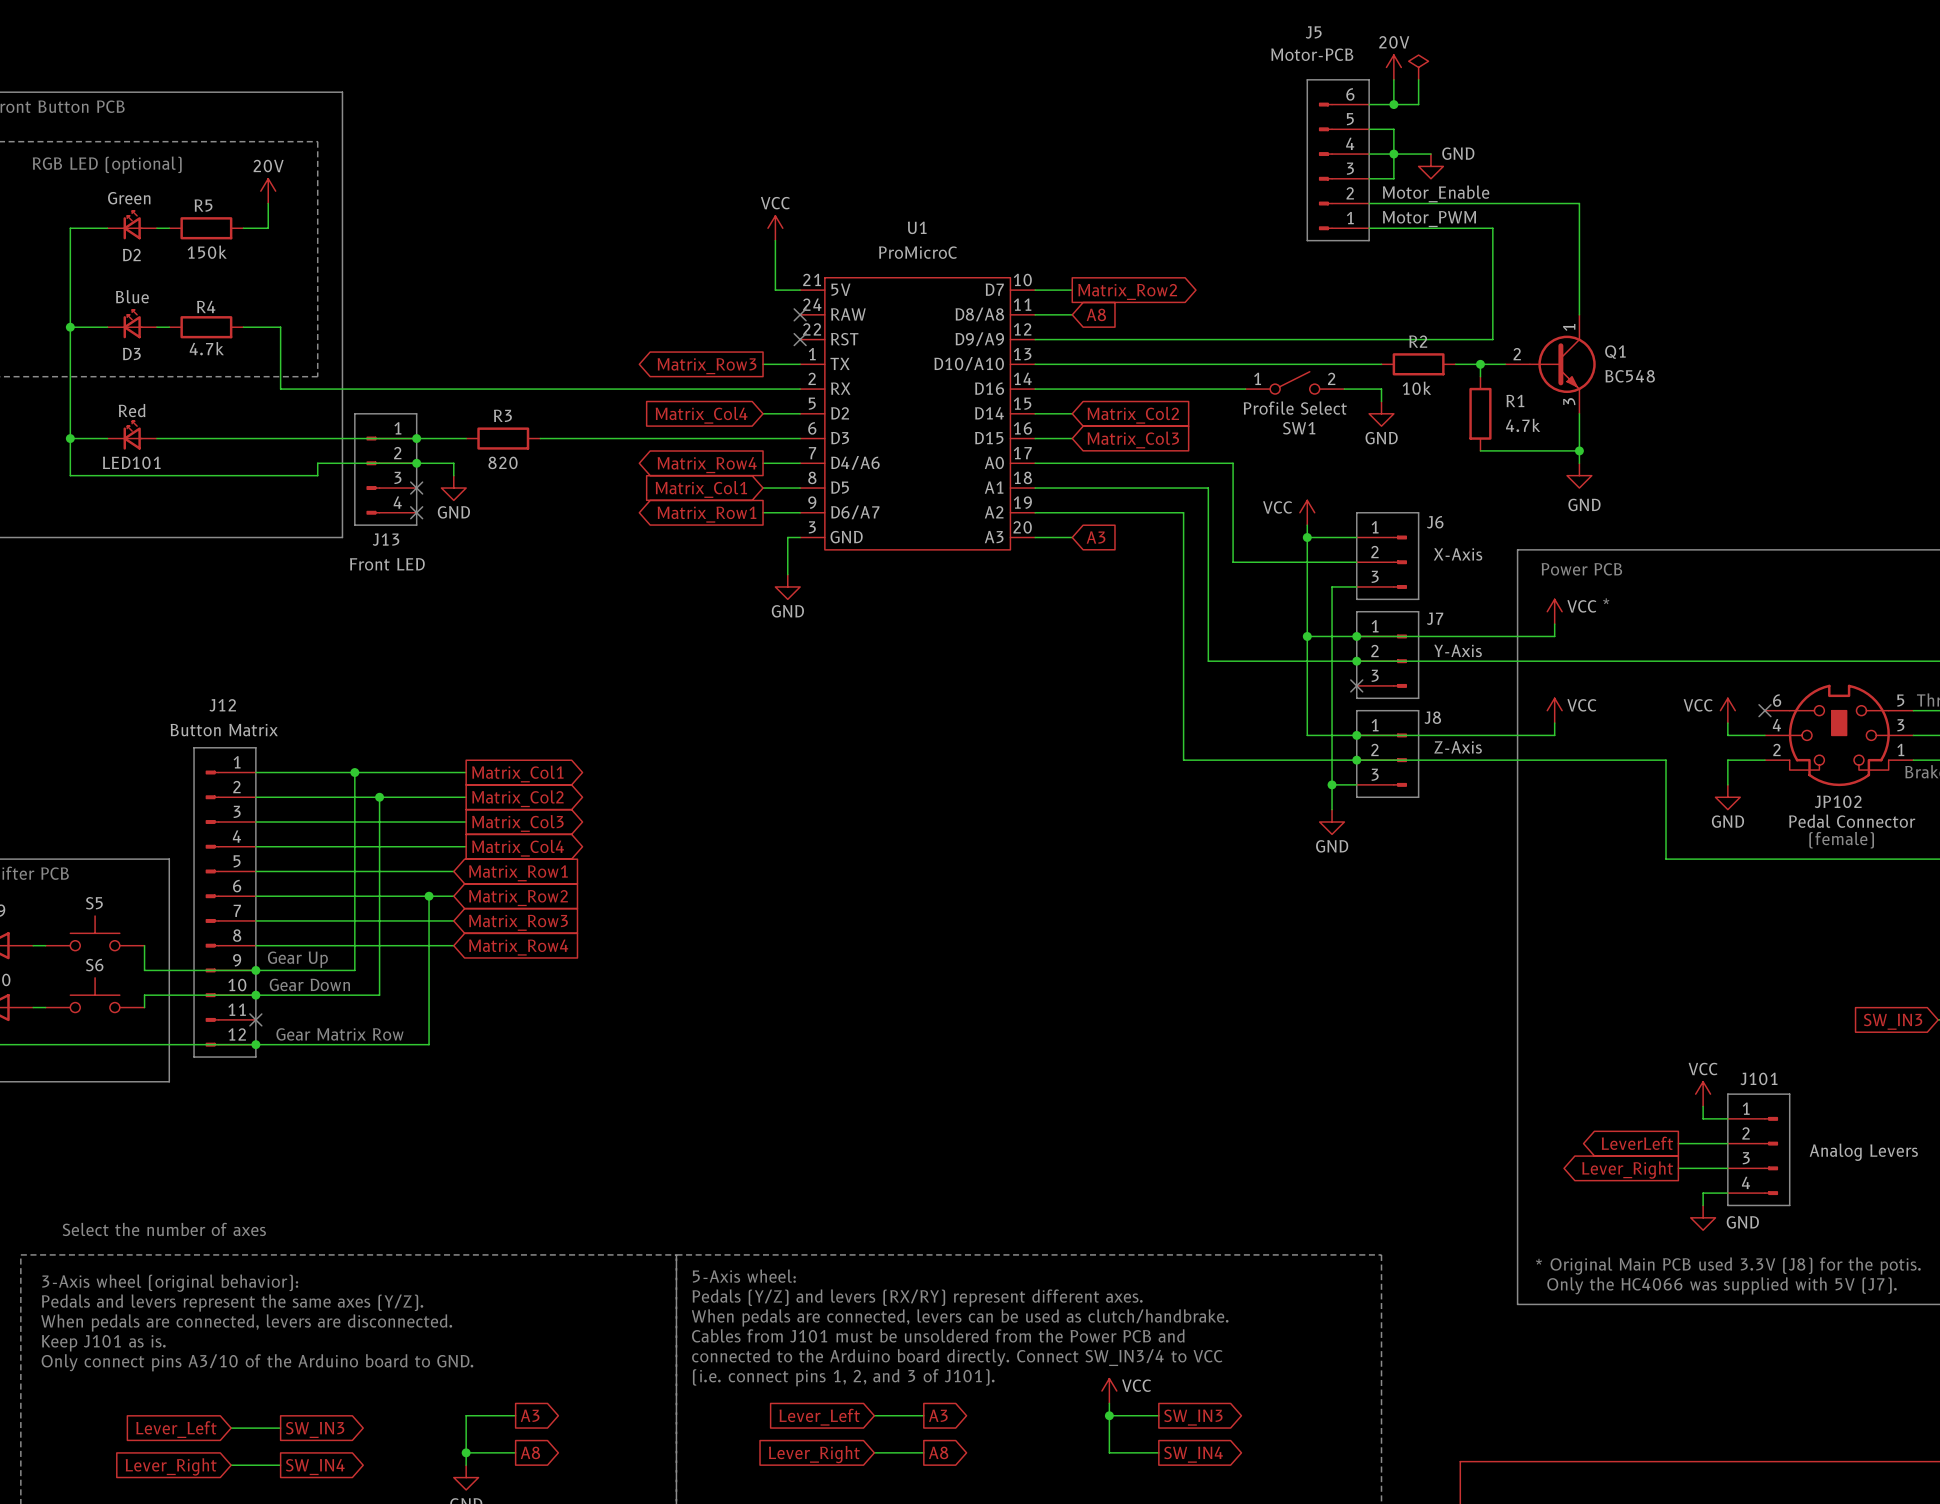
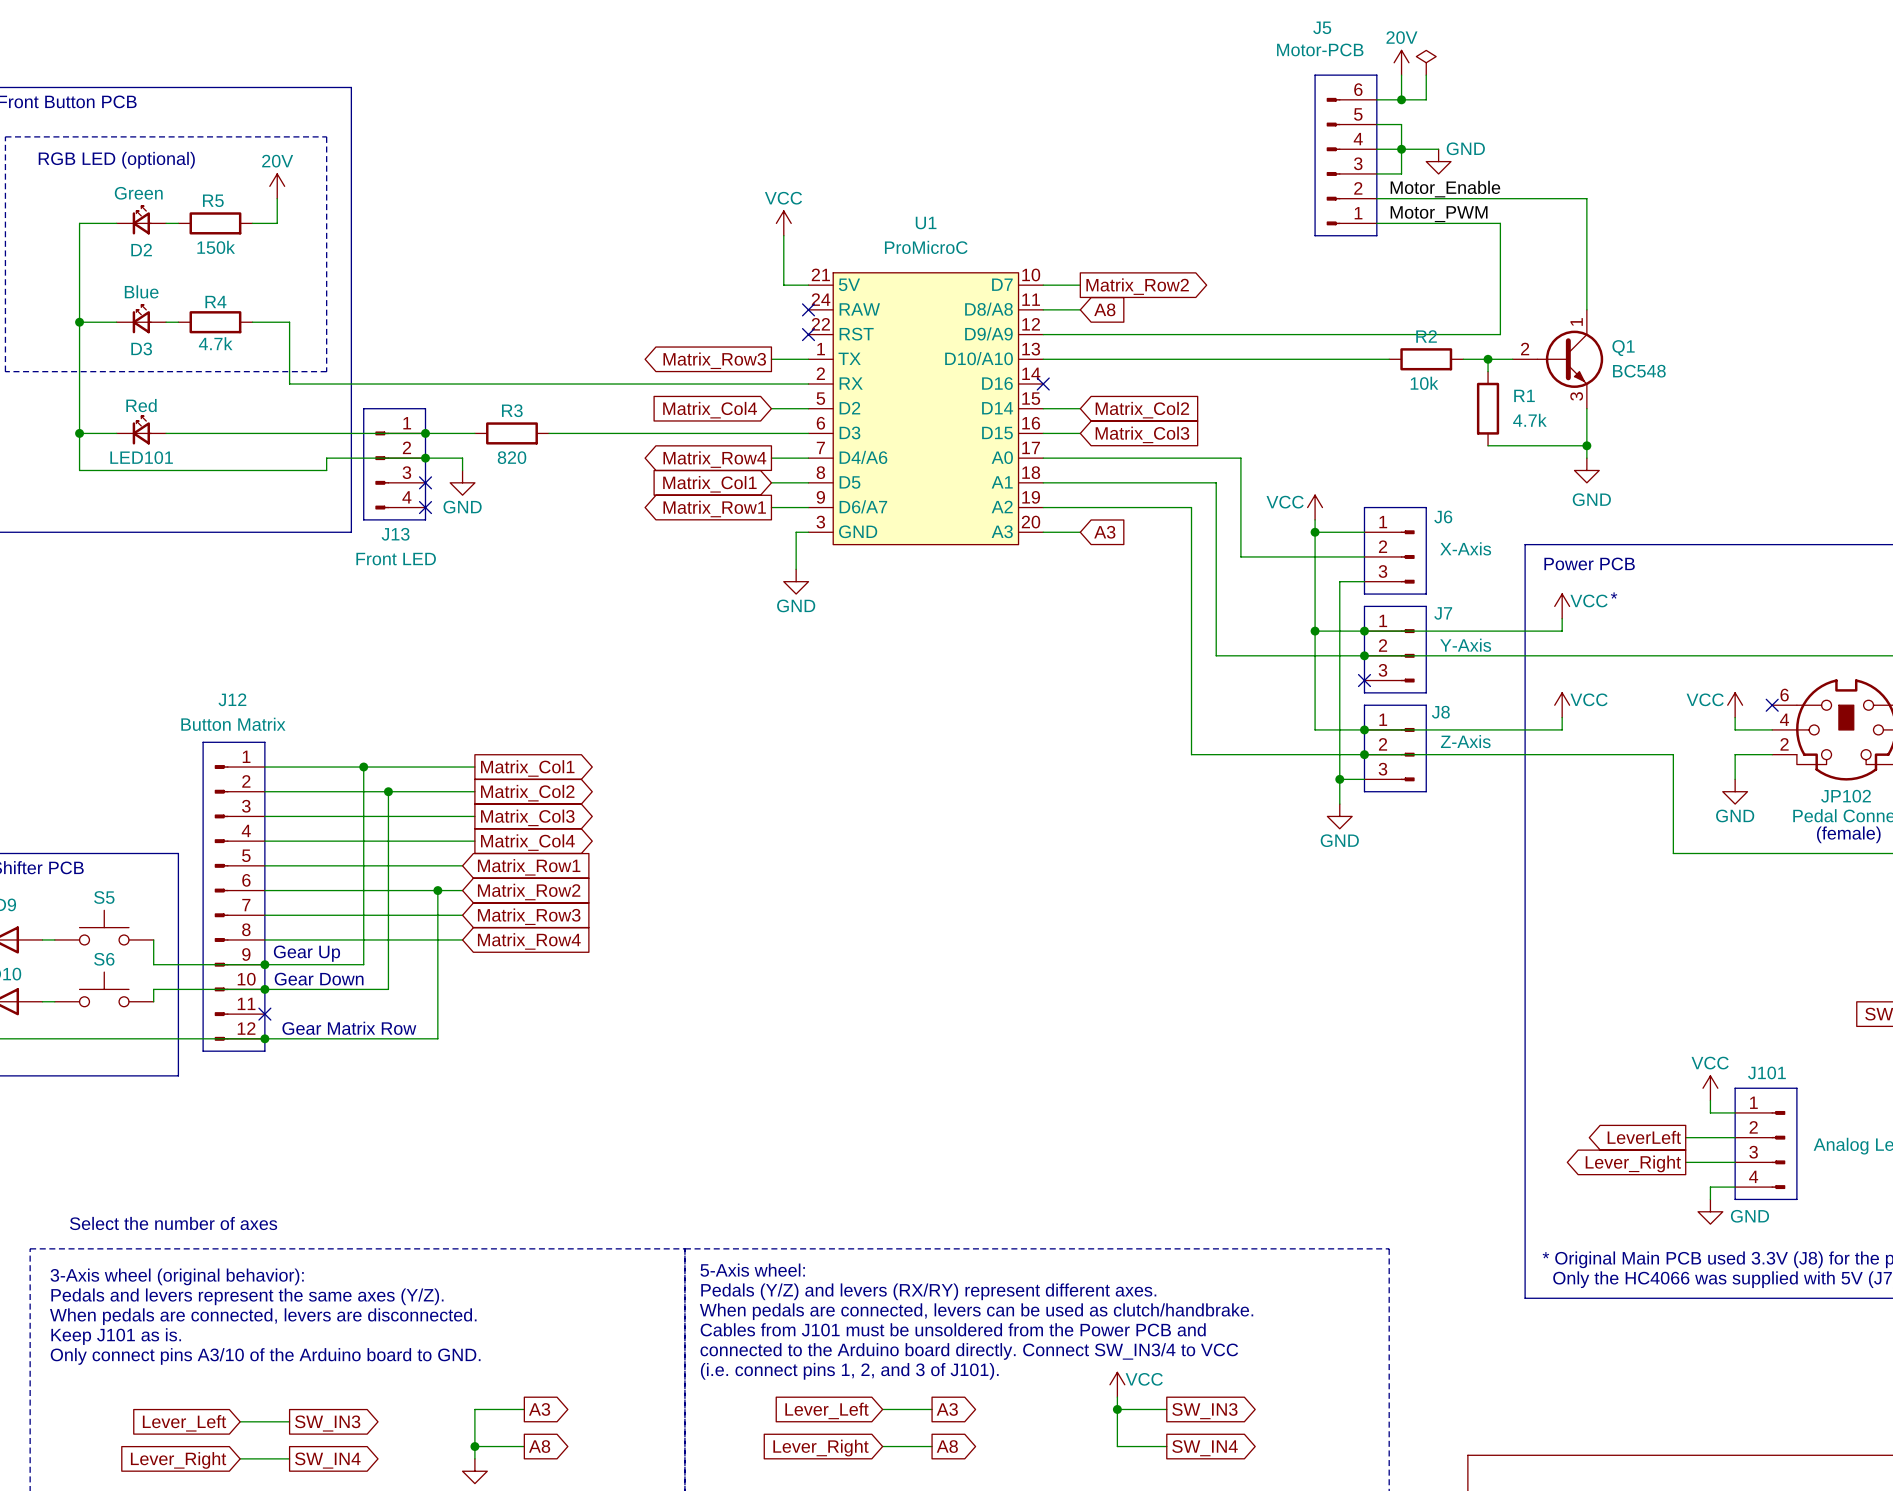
SW1: Profile Select (1294, 382) -> none
wire: (1035, 389) (1245, 389) -> none
no-connect mark: none -> (1043, 384)
wire: (1344, 389) (1381, 389) (1381, 401) -> none
power symbol: GND (1381, 413) -> none

